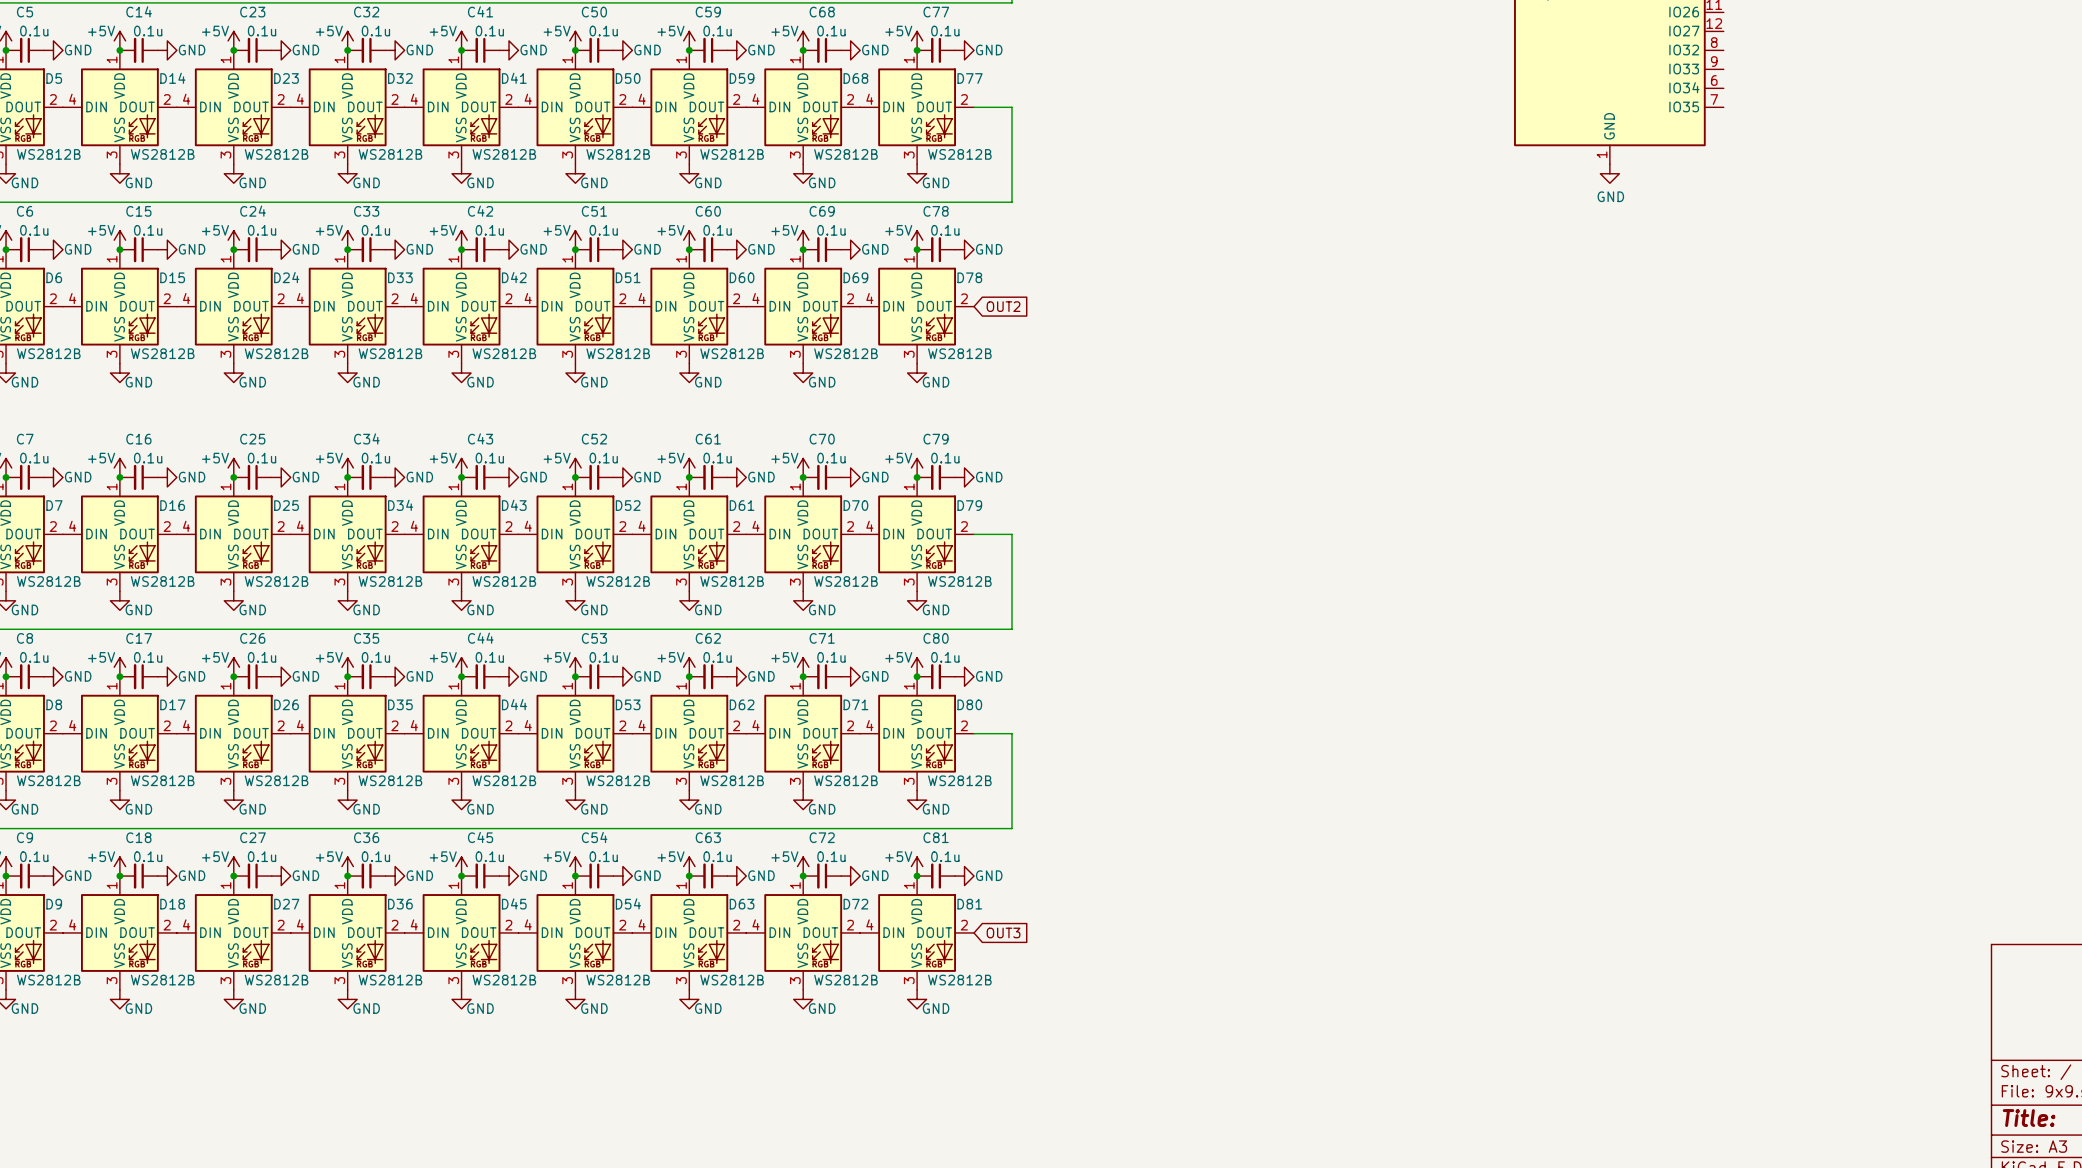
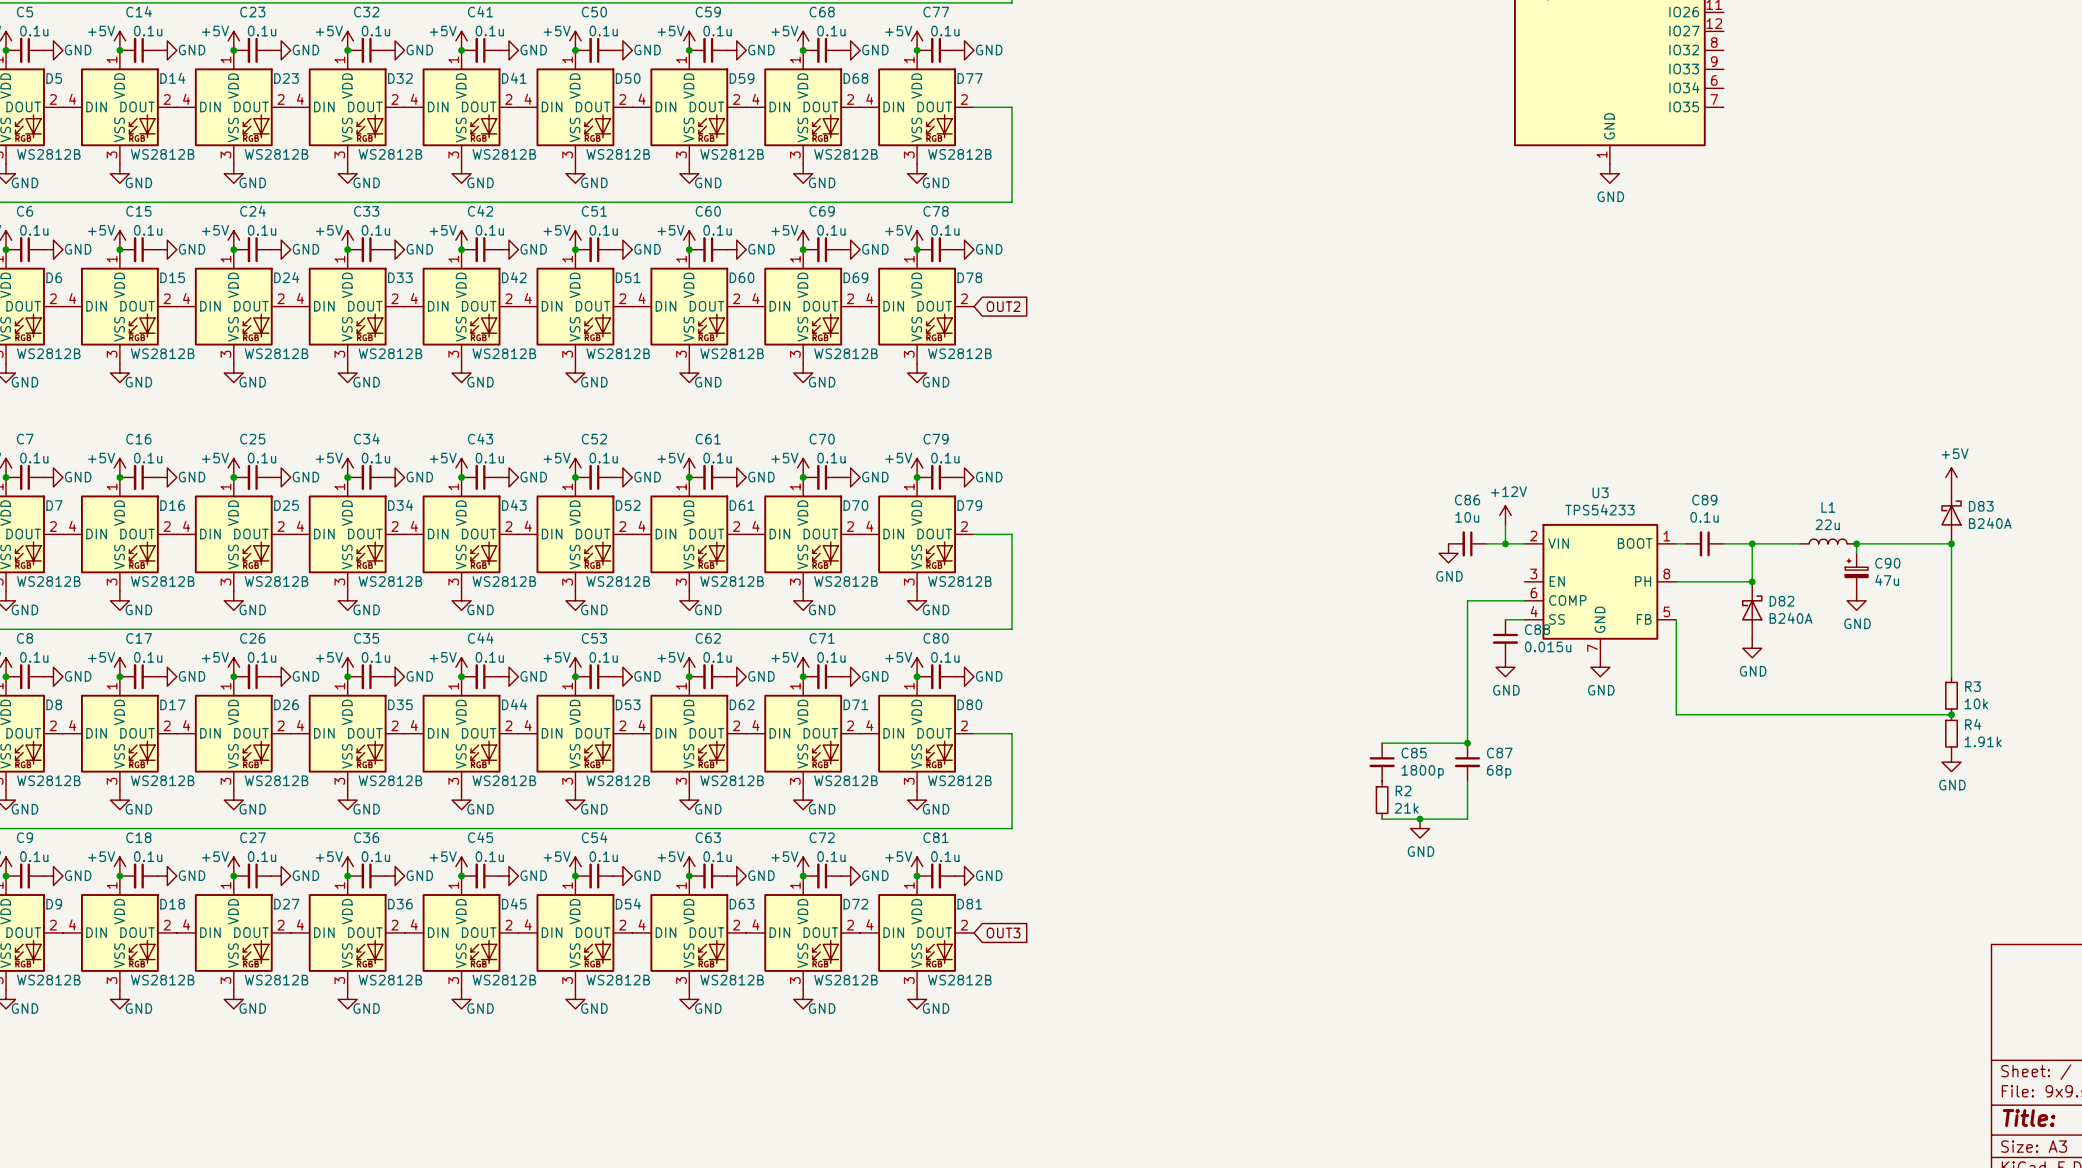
power symbol: none -> +5V (1951, 477)
power symbol: none -> +12V (1505, 515)
D83: none -> B240A (1951, 515)
wire: none -> (1505, 524) (1505, 543)
L1: none -> 22u (1828, 541)
C86: none -> 10u (1467, 543)
wire: none -> (1486, 543) (1524, 543)
junction: none -> (1505, 543)
wire: none -> (1676, 543) (1685, 543)
C89: none -> 0.1u (1704, 543)
wire: none -> (1723, 543) (1799, 543)
wire: none -> (1752, 543) (1752, 581) (1676, 581)
junction: none -> (1752, 543)
junction: none -> (1856, 543)
junction: none -> (1951, 543)
power symbol: none -> GND (1448, 553)
wire: none -> (1856, 553) (1856, 543) (1951, 543) (1951, 676)
C90: none -> 47u (1856, 572)
junction: none -> (1752, 581)
U3: none -> TPS54233 (1600, 590)
wire: none -> (1524, 600) (1467, 600) (1467, 743) (1382, 743)
power symbol: none -> GND (1856, 600)
D82: none -> B240A (1752, 610)
wire: none -> (1505, 619) (1524, 619)
wire: none -> (1676, 619) (1676, 714) (1951, 714)
C88: none -> 0.015u (1505, 638)
power symbol: none -> GND (1752, 648)
power symbol: none -> GND (1505, 667)
power symbol: none -> GND (1600, 667)
R3: none -> 10k (1951, 695)
junction: none -> (1951, 714)
R4: none -> 1.91k (1951, 733)
junction: none -> (1467, 743)
C85: none -> 1800p (1382, 762)
C87: none -> 68p (1467, 762)
power symbol: none -> GND (1951, 762)
wire: none -> (1467, 781) (1467, 819) (1382, 819)
R2: none -> 21k (1382, 800)
junction: none -> (1420, 819)
power symbol: none -> GND (1420, 828)

